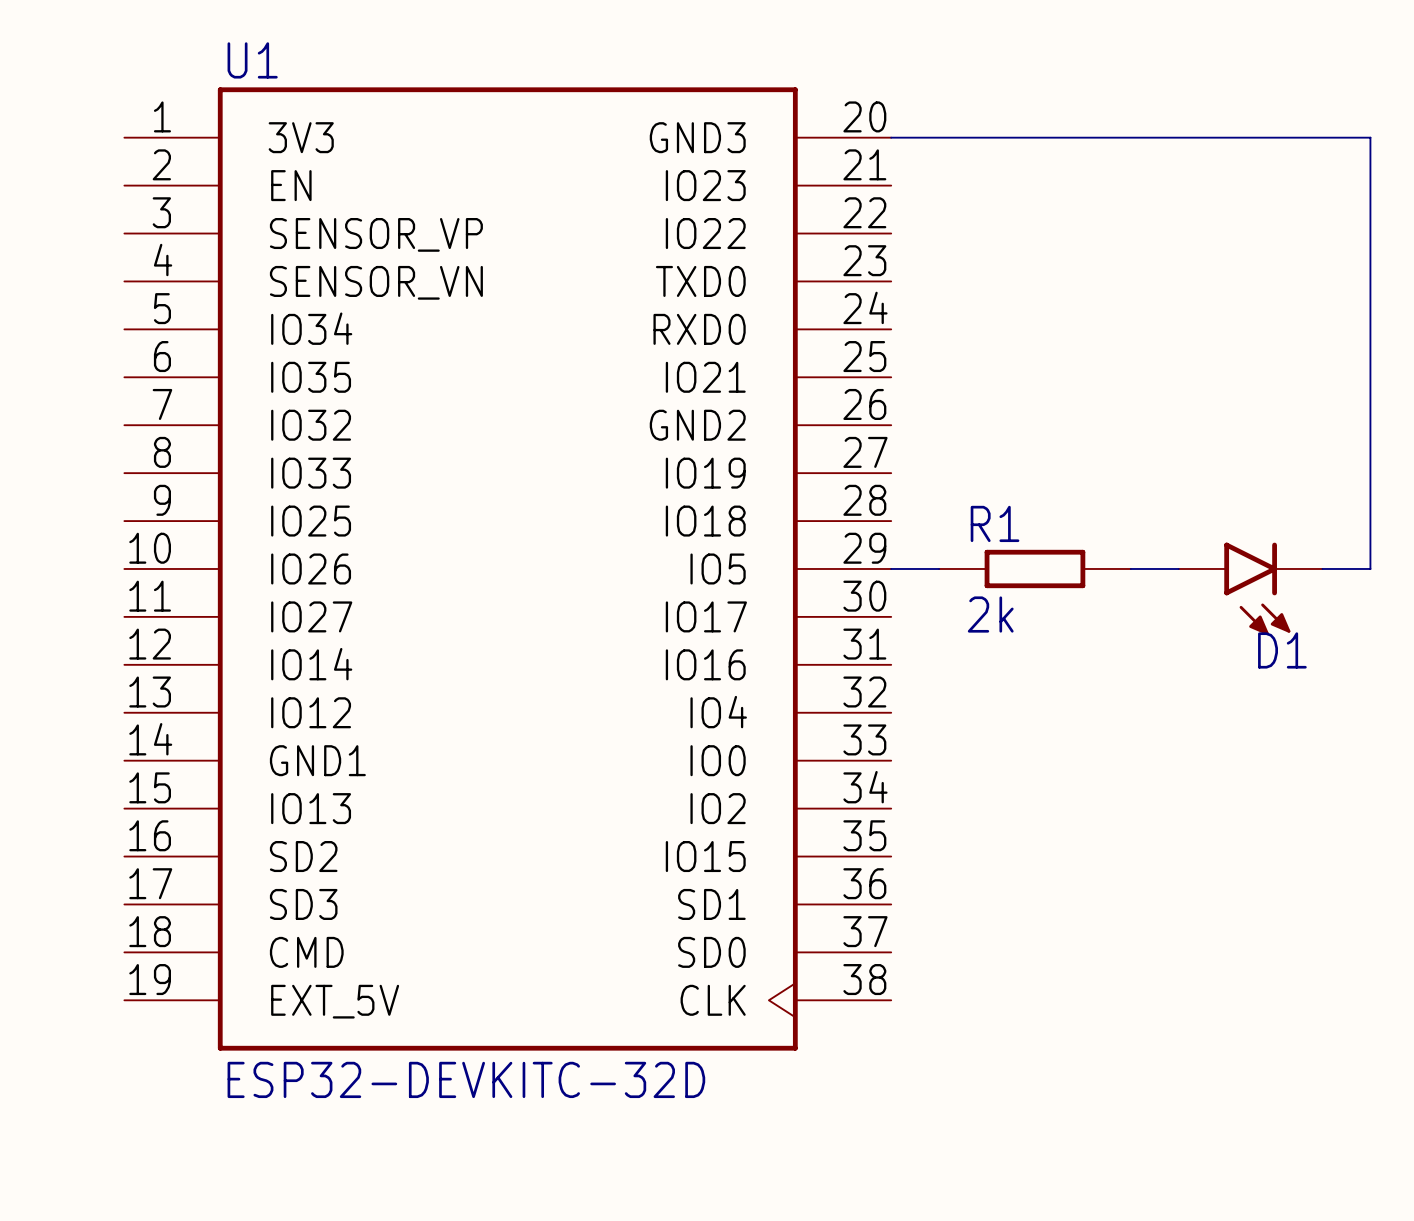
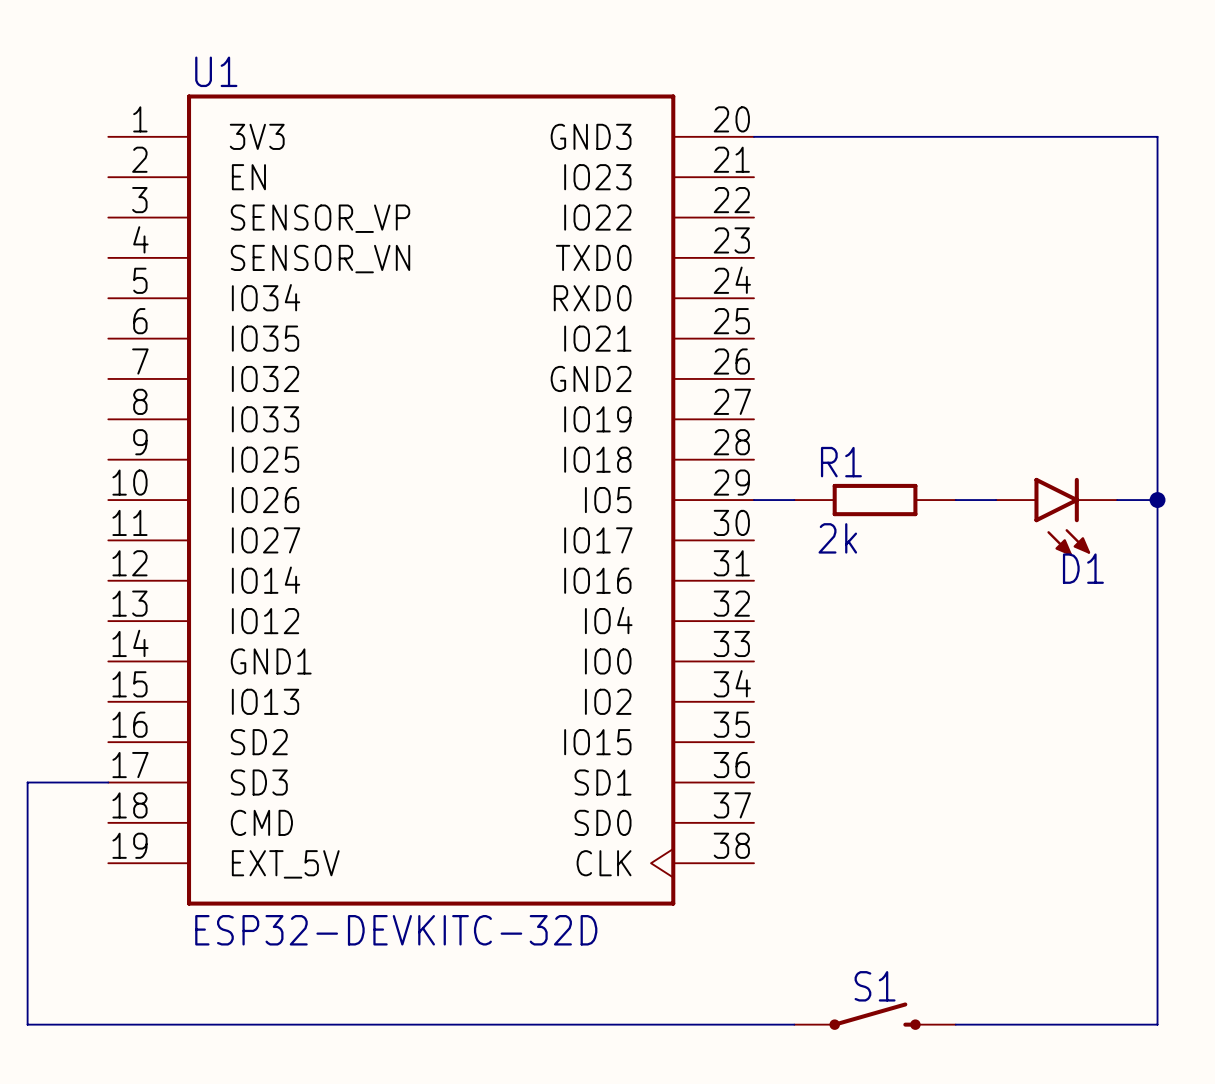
wire: none -> (1157, 500) (1157, 1024) (955, 1024)
junction: none -> (1157, 500)
wire: none -> (108, 782) (27, 782) (27, 1024) (794, 1024)
S1: none -> (875, 1016)

